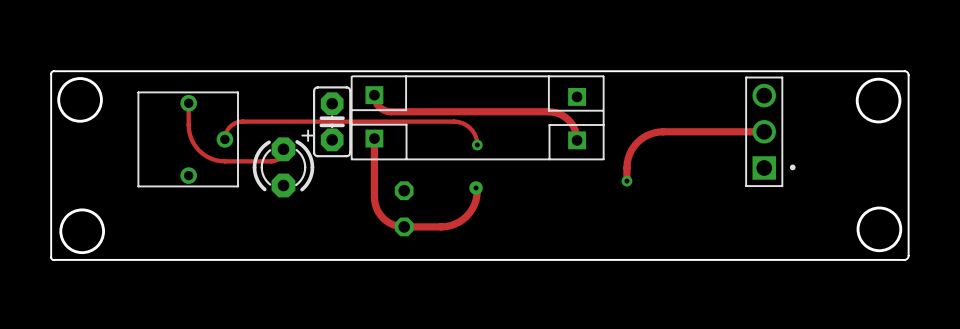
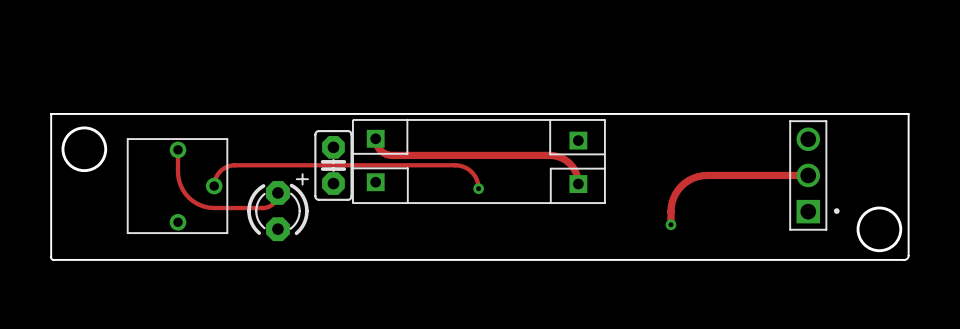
round board edge: [57, 77, 103, 123] -> none
round board edge: [855, 77, 902, 124] -> none
track: (374, 95) (377, 105) (388, 111) (555, 112) (571, 122) (577, 140) -> (375, 138) (379, 148) (390, 155) (557, 156) (572, 166) (578, 184)
track: (188, 103) (189, 129) (191, 139) (199, 150) (211, 158) (224, 161) (274, 160) (282, 153) (283, 142) -> none
board edge: (51, 113) (51, 73) (53, 71) (904, 71) (908, 74) (908, 113) -> (51, 113) (908, 113)
part position: (477, 117) -> (478, 161)
part position: (332, 121) -> (333, 165)
round board edge: none -> [61, 126, 108, 173]
track: (764, 131) (663, 131) (649, 134) (637, 142) (629, 154) (627, 163) (626, 181) -> (808, 175) (707, 175) (693, 178) (681, 186) (673, 197) (671, 206) (670, 224)
part position: (770, 131) -> (814, 175)
track: (374, 138) (375, 204) (383, 218) (392, 224) (404, 226) (441, 226) (454, 224) (466, 216) (472, 208) (476, 195) (476, 187) -> none
part position: (188, 139) -> (177, 186)
track: (224, 139) (230, 126) (240, 121) (453, 121) (462, 123) (470, 128) (475, 136) (477, 145) -> none
via position: (477, 145) -> (478, 188)
track: none -> (178, 149) (178, 176) (180, 185) (188, 197) (200, 205) (214, 208) (266, 207) (275, 200) (277, 186)
part position: (283, 163) -> (278, 207)
via position: (626, 181) -> (670, 224)
track: none -> (214, 186) (218, 173) (224, 168) (232, 165) (455, 165) (464, 167) (471, 172) (476, 179) (478, 188)
via: (476, 187) -> none
round board edge: [59, 208, 105, 255] -> none
part: (404, 208) -> none

